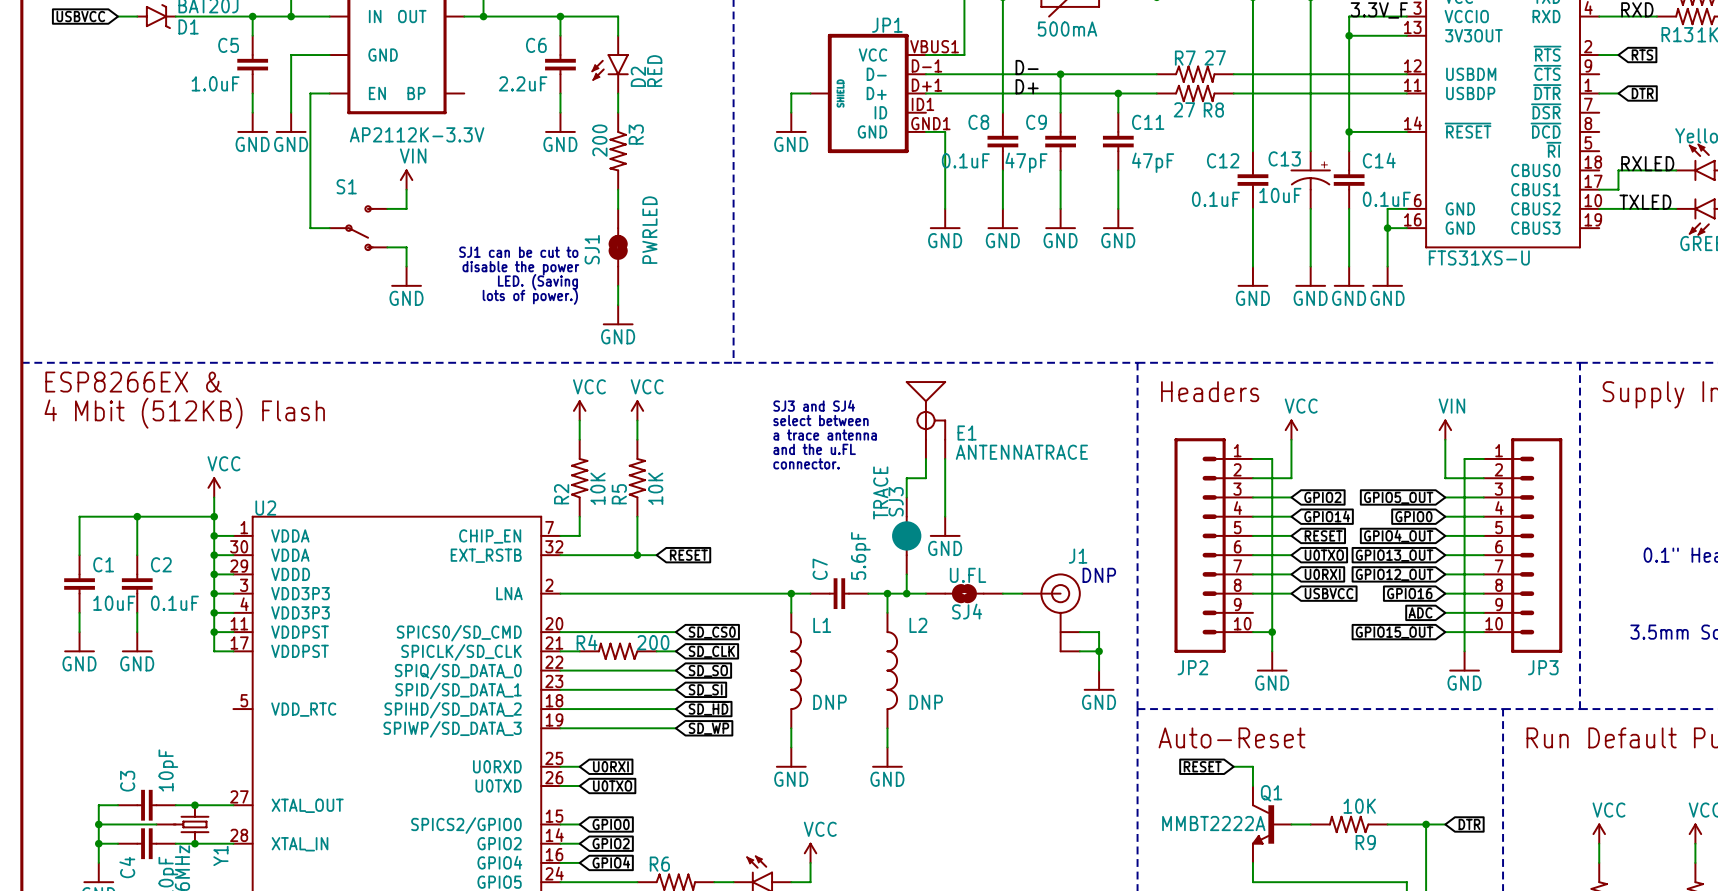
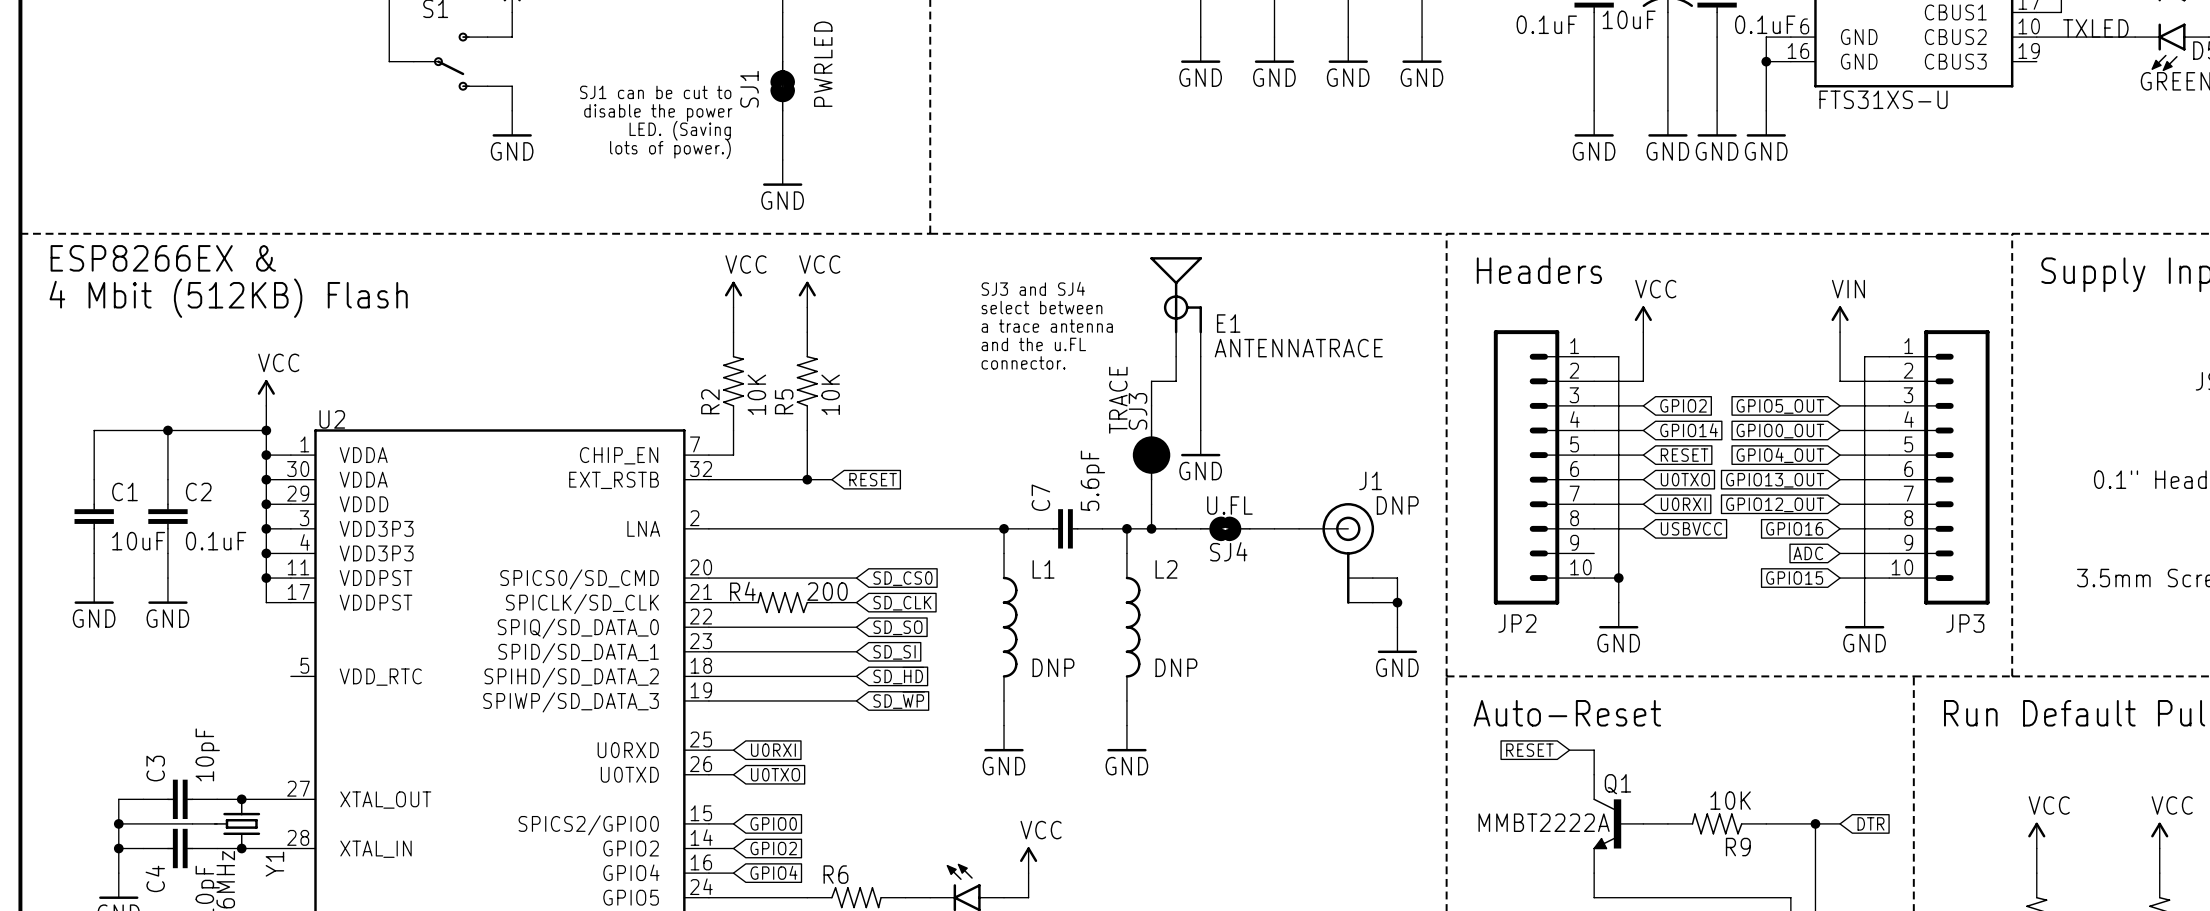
global label: GPIO0 (1413, 516) -> GPIO0_OUT (1780, 431)
global label: GPIO15_OUT (1394, 632) -> GPIO15 (1794, 578)

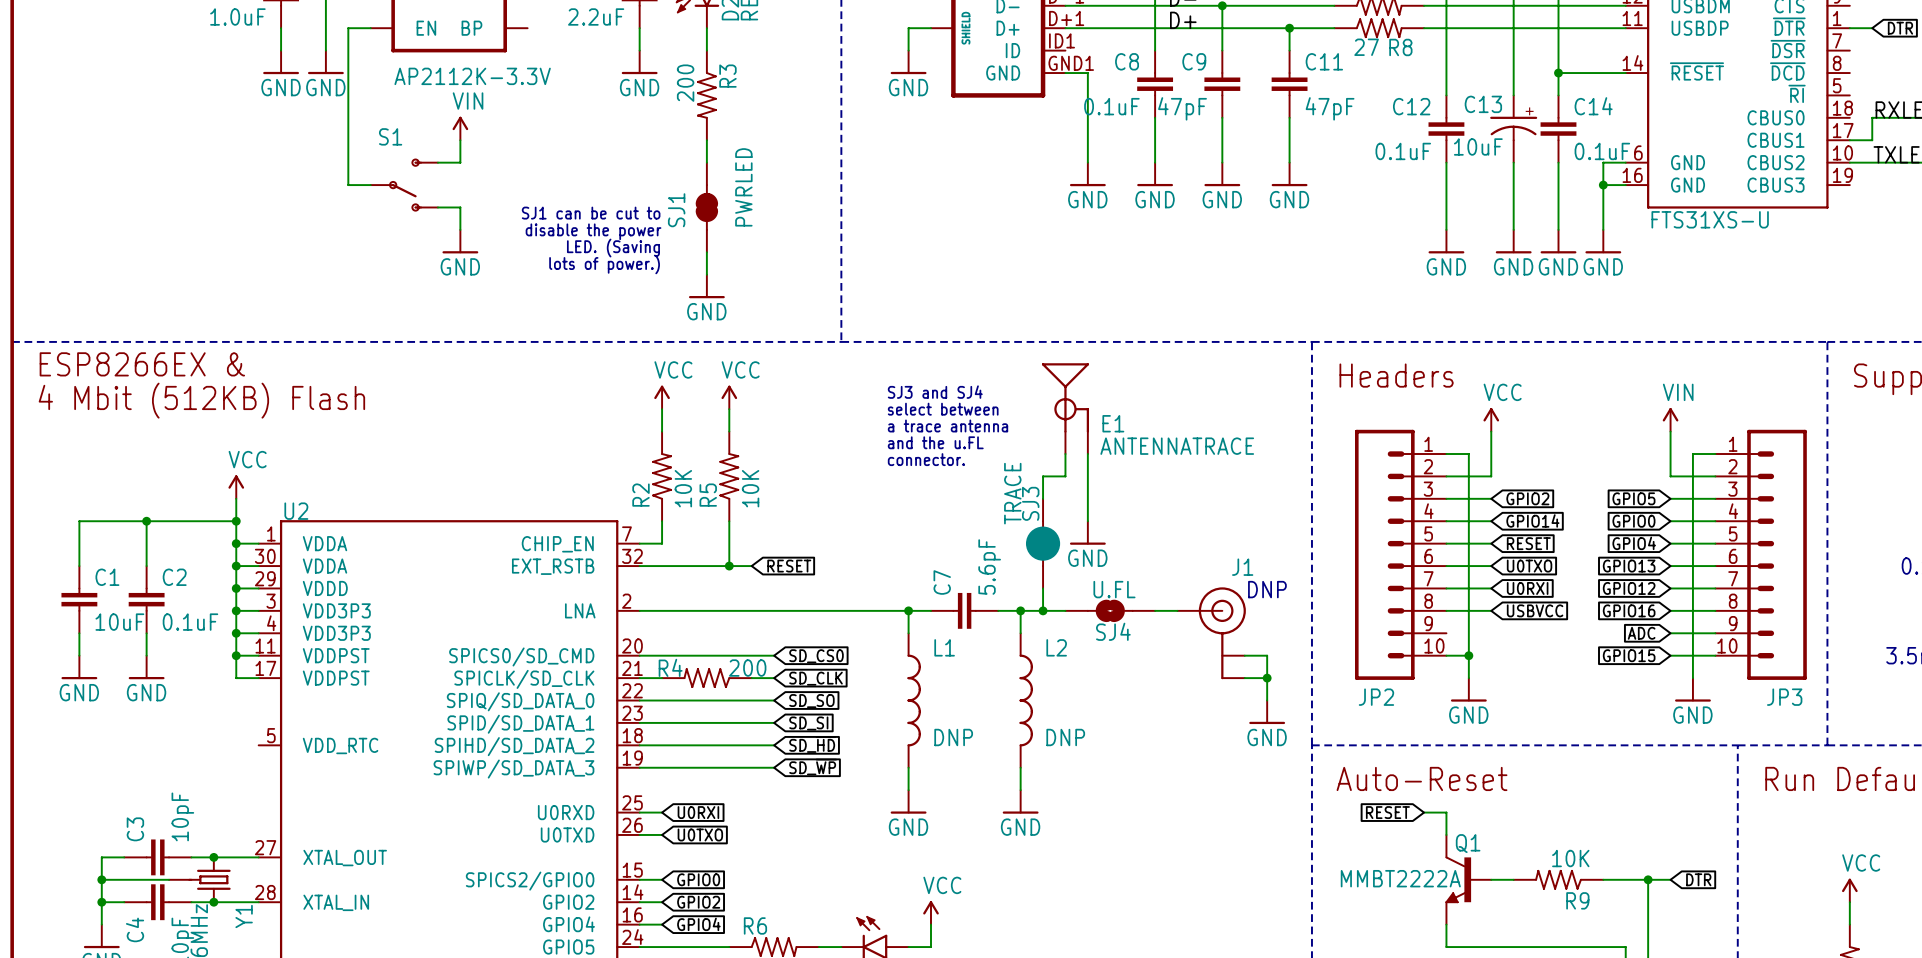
global label: GPIO5_OUT (1780, 406) -> GPIO5 (1633, 498)
global label: GPIO0_OUT (1780, 431) -> GPIO0 (1633, 521)
global label: GPIO4_OUT (1780, 455) -> GPIO4 (1634, 543)
global label: GPIO13_OUT (1775, 480) -> GPIO13 (1629, 566)
global label: GPIO12_OUT (1775, 504) -> GPIO12 (1629, 588)

